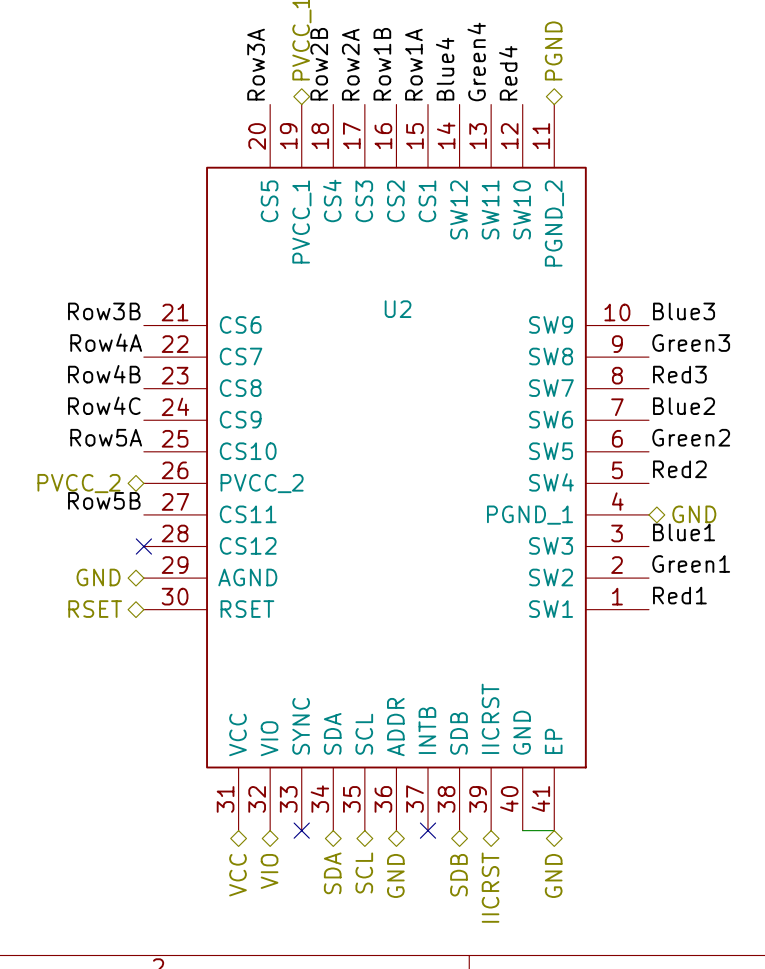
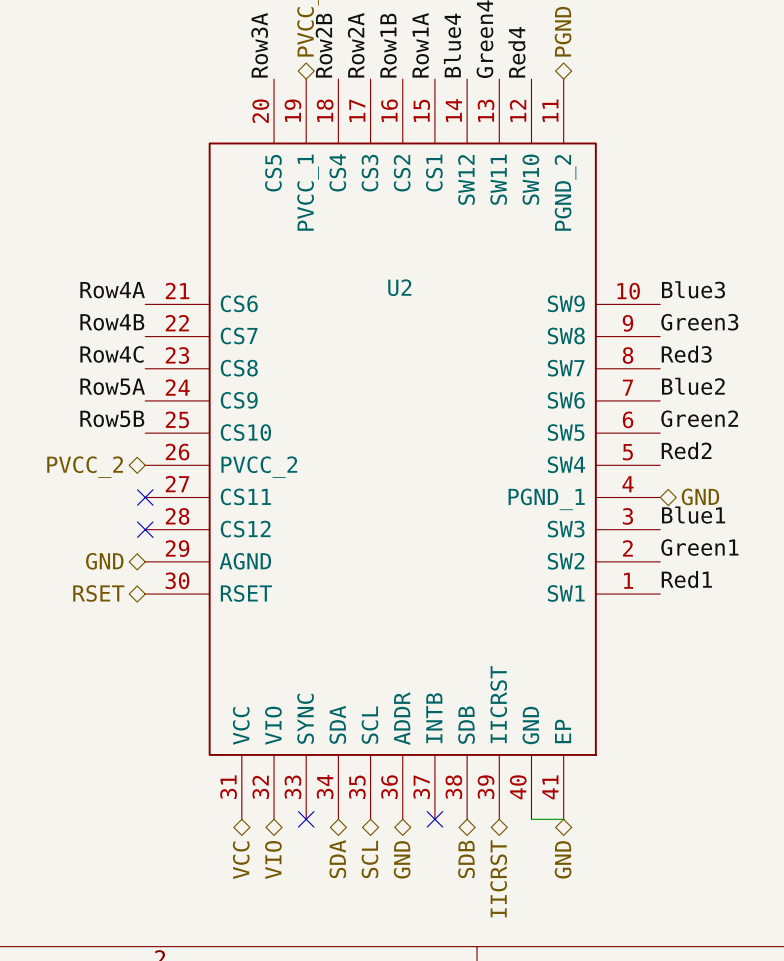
label: Row3B (104, 311) -> Row4A (112, 290)
label: Row4A (106, 342) -> Row4B (112, 322)
label: Row4B (104, 374) -> Row4C (111, 354)
label: Row4C (104, 405) -> Row5A (112, 386)
label: Row5A (106, 437) -> Row5B (112, 418)
label: Row5B (104, 500) -> none
no-connect mark: none -> (145, 497)

